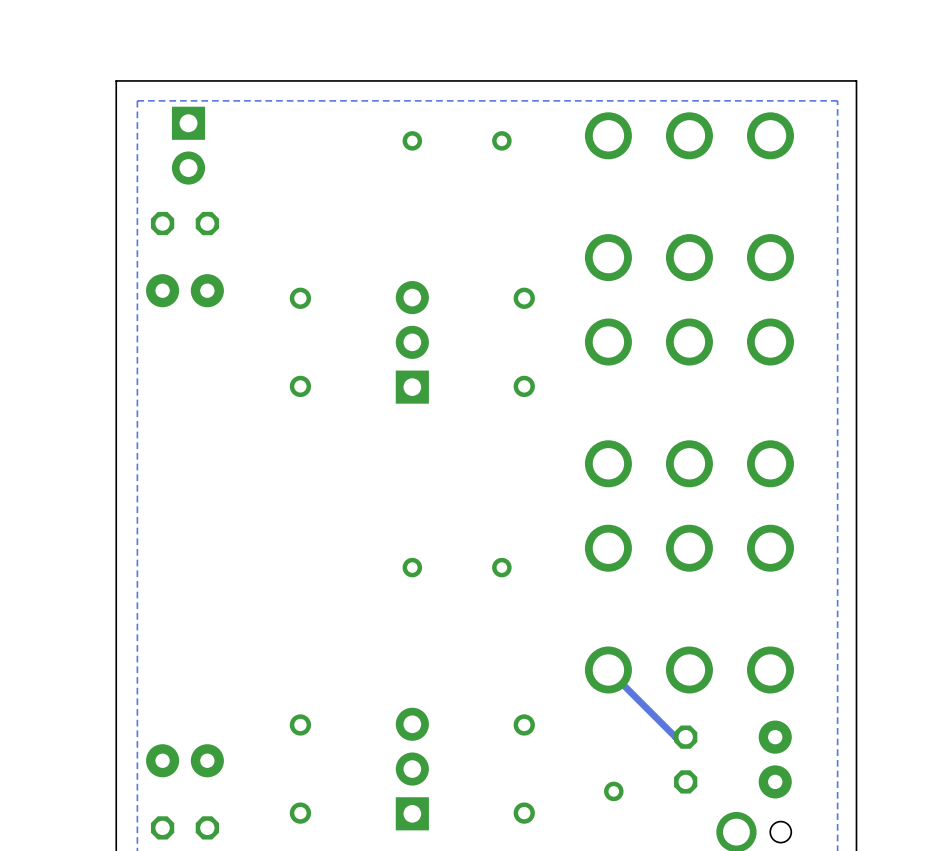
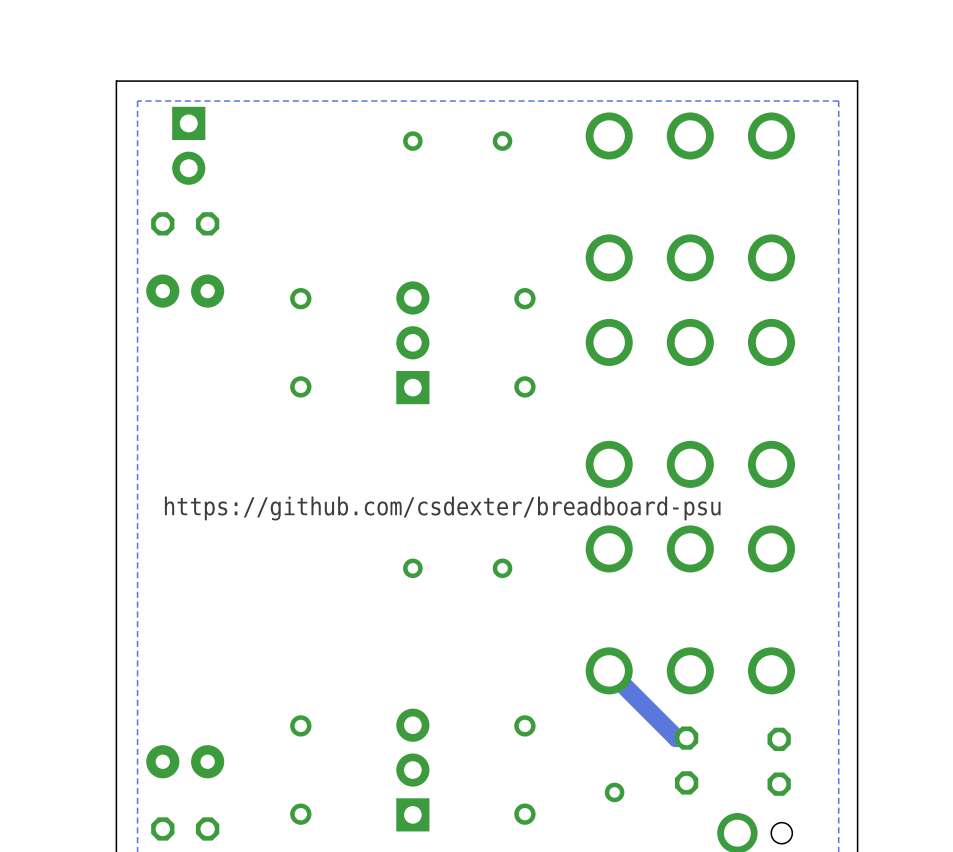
text: none -> https://github.com/csdexter/breadboard-psu (442, 508)
track width: thin (608, 669) (675, 737) (685, 737) -> thick (609, 670) (676, 738) (686, 738)
part footprint: [758, 720, 792, 799] -> [767, 727, 791, 796]

